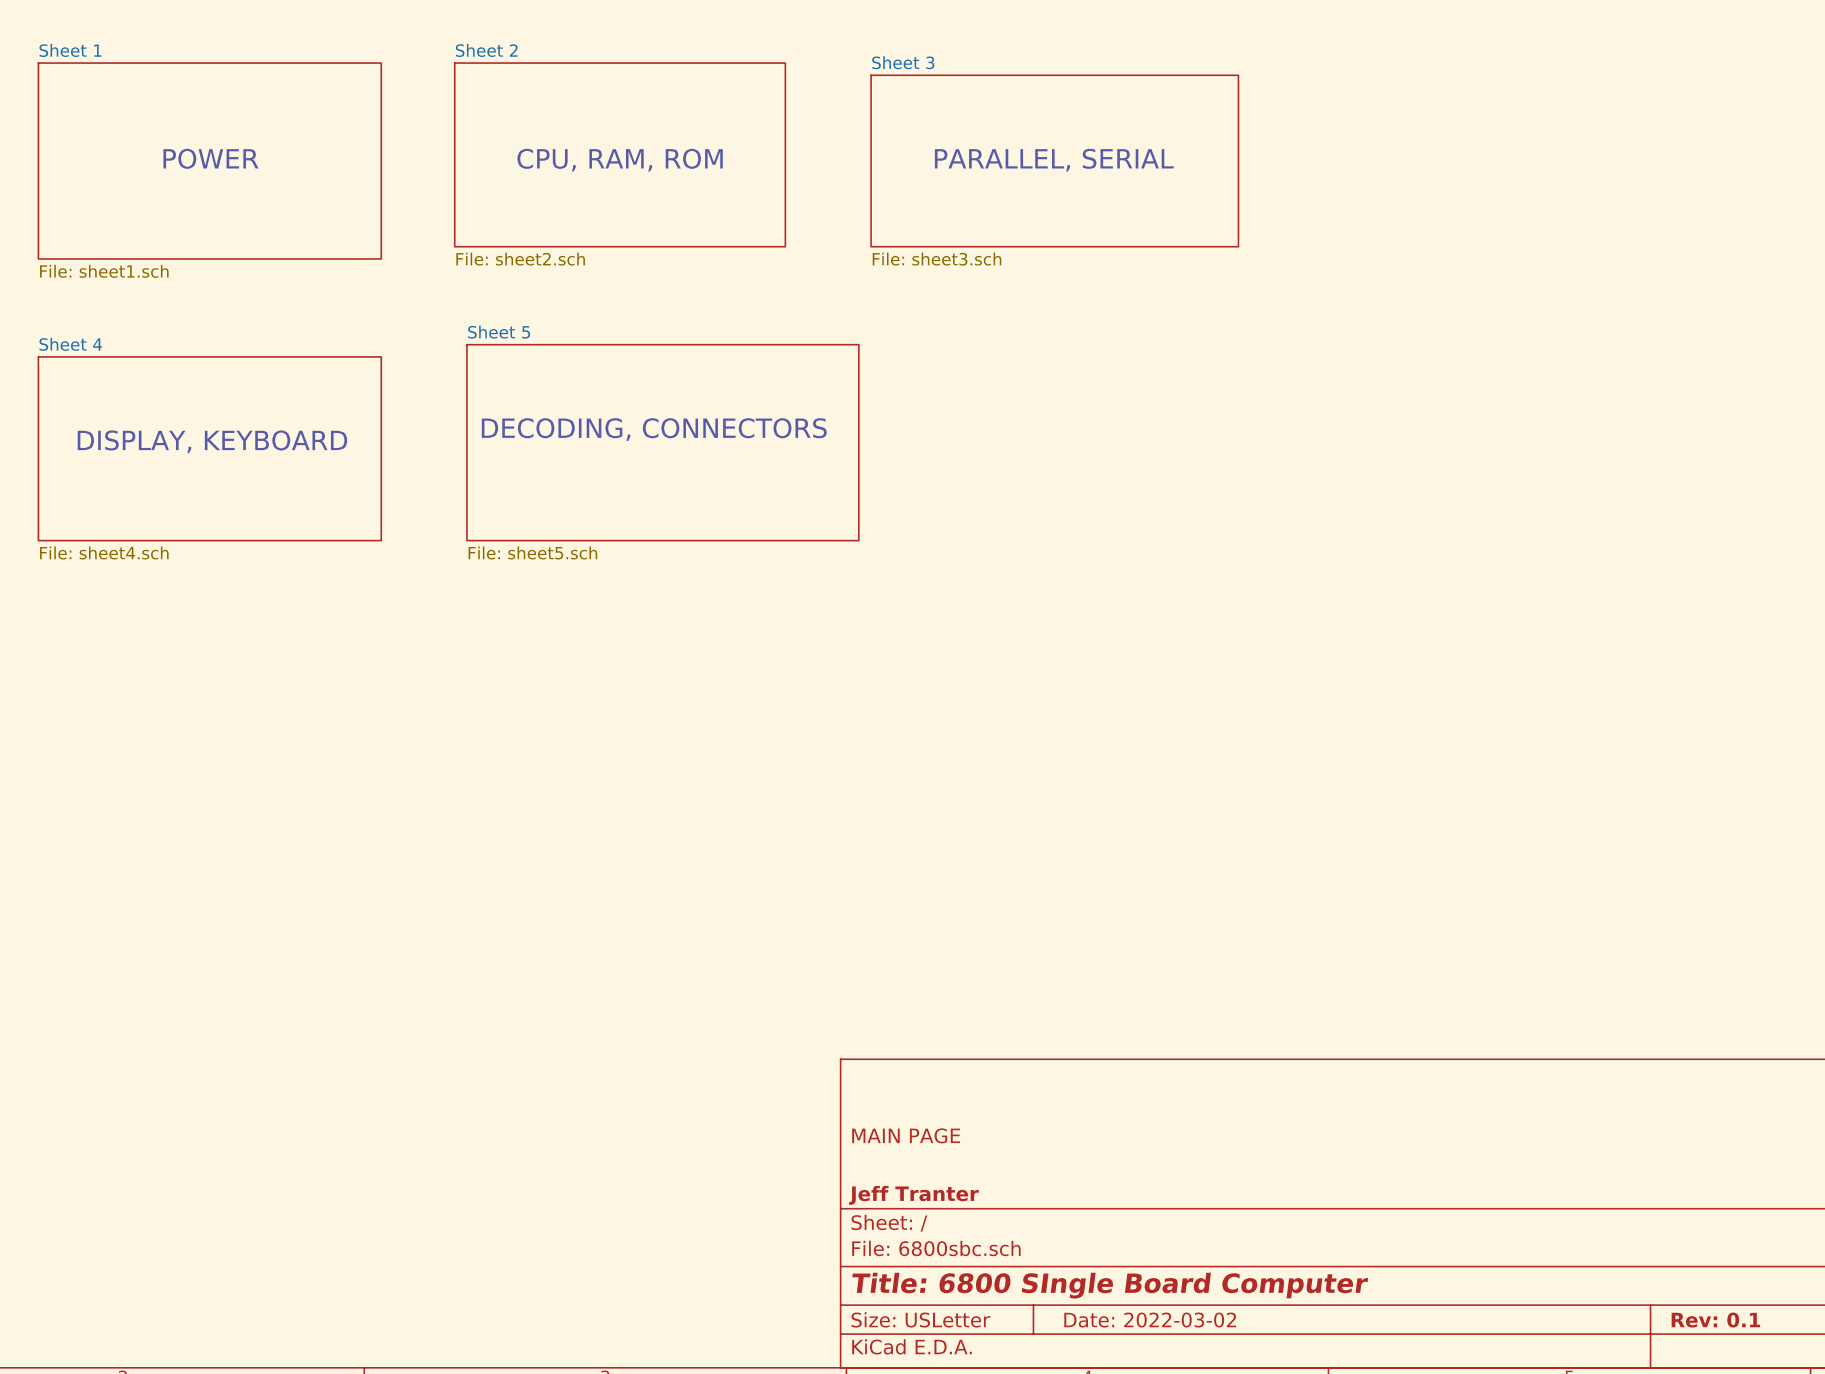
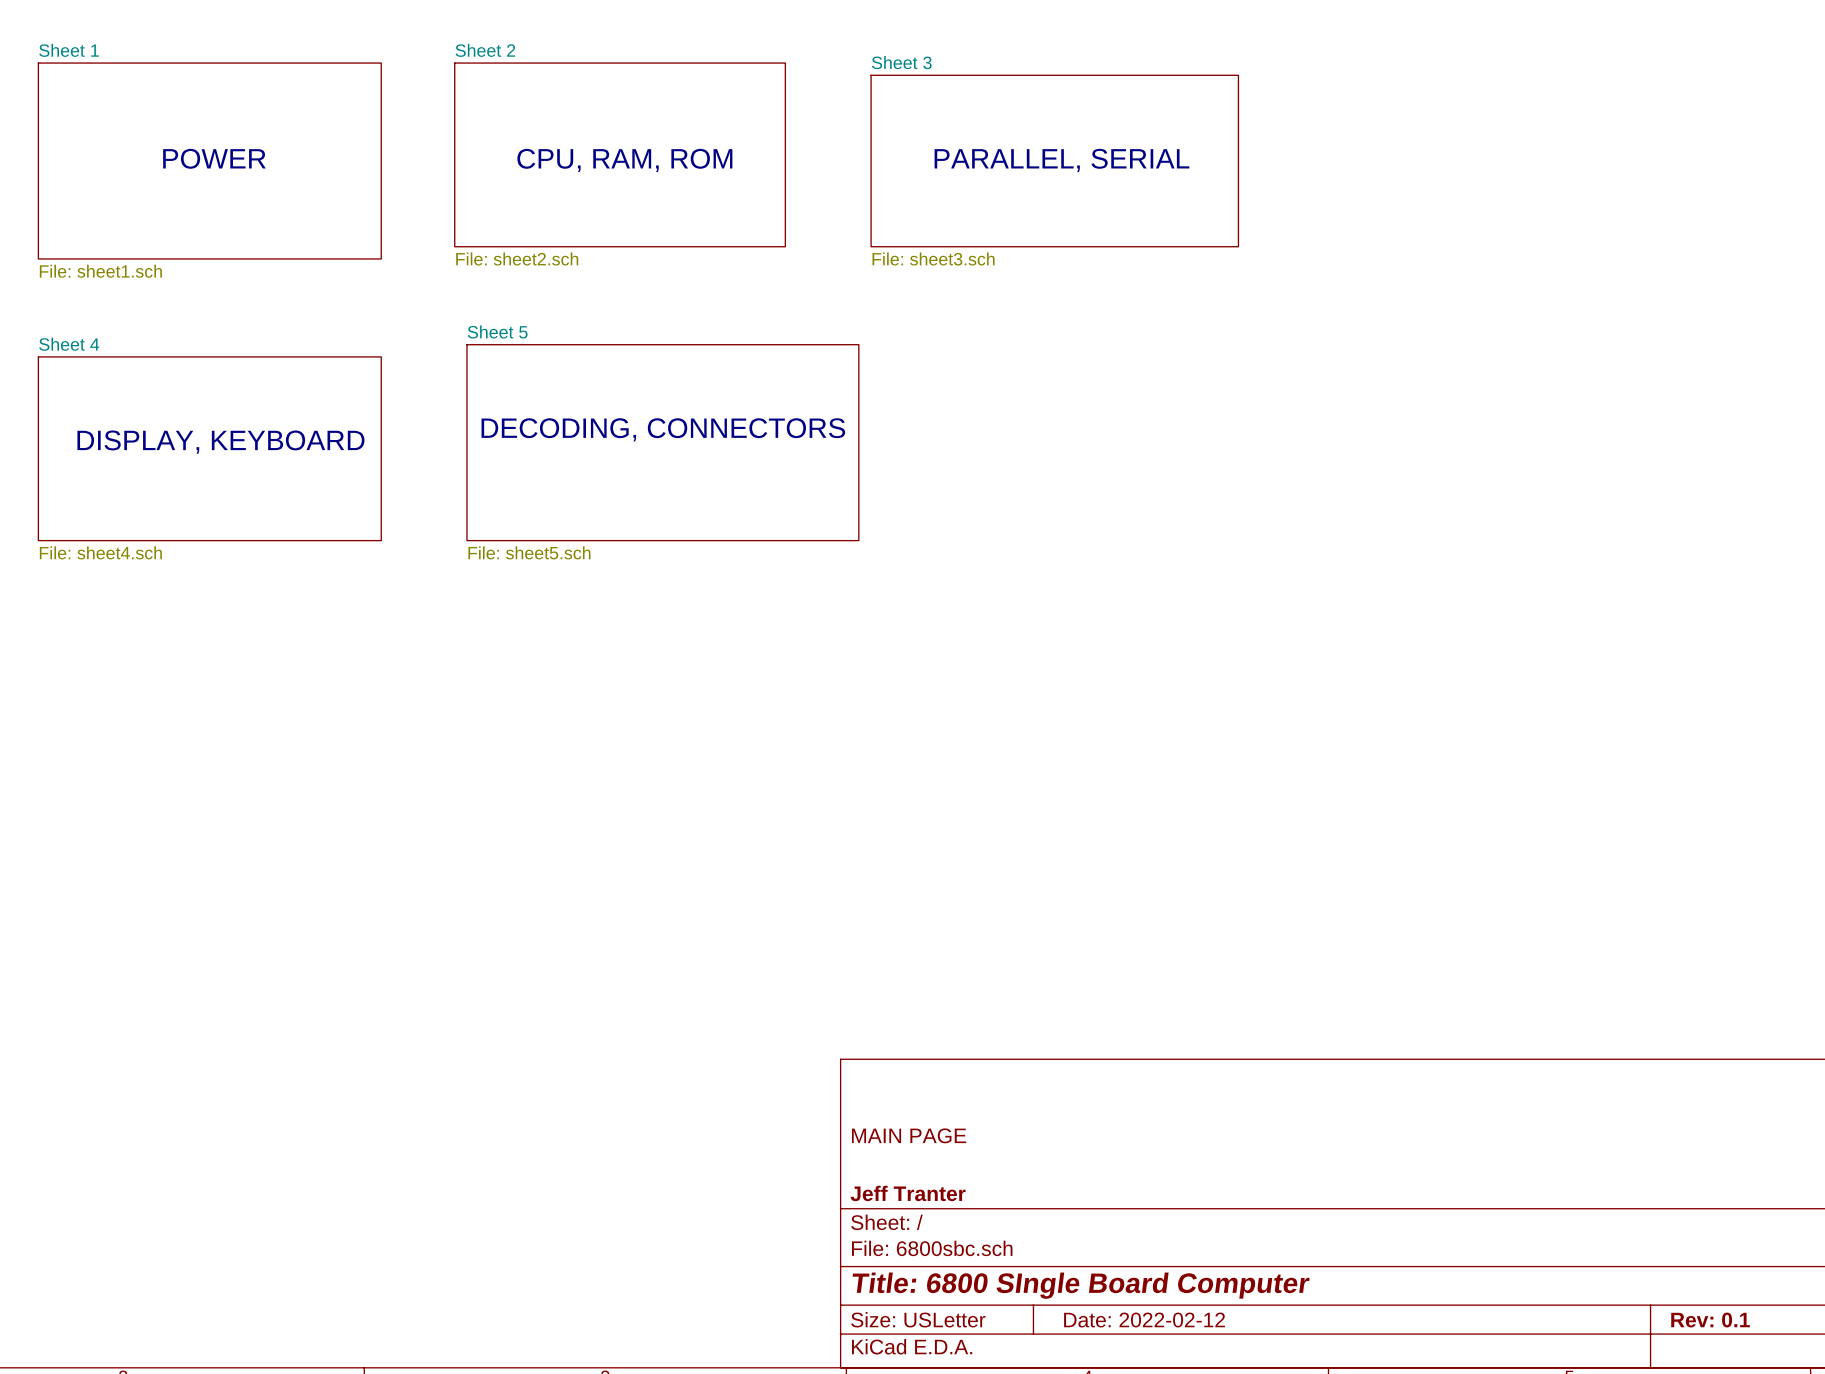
title block: Date: 2022-03-02 (1150, 1320) -> Date: 2022-02-12 (1144, 1320)

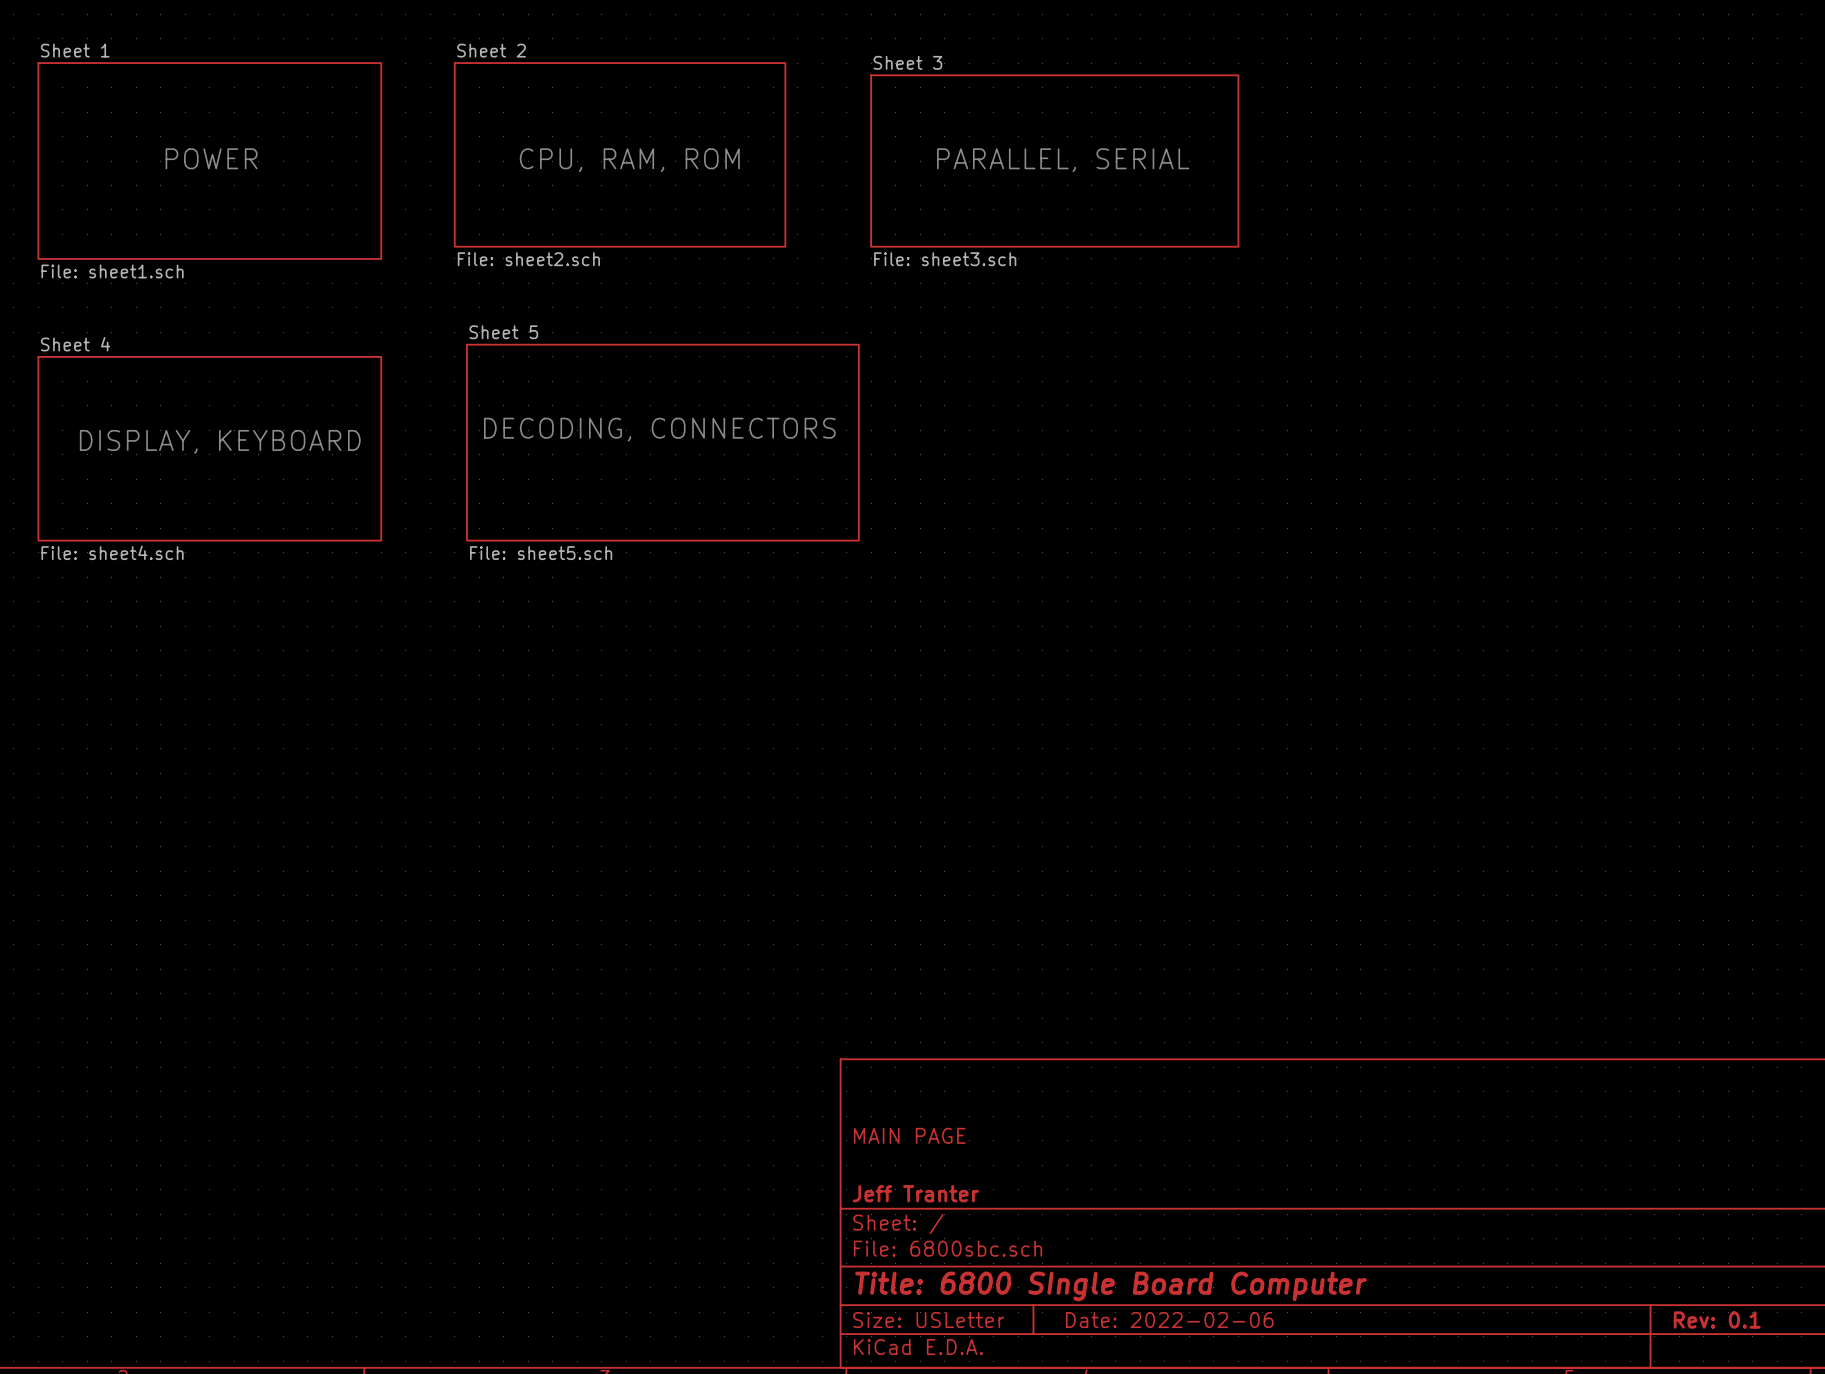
title block: Date: 2022-02-12 (1144, 1320) -> Date: 2022-02-06 (1169, 1320)

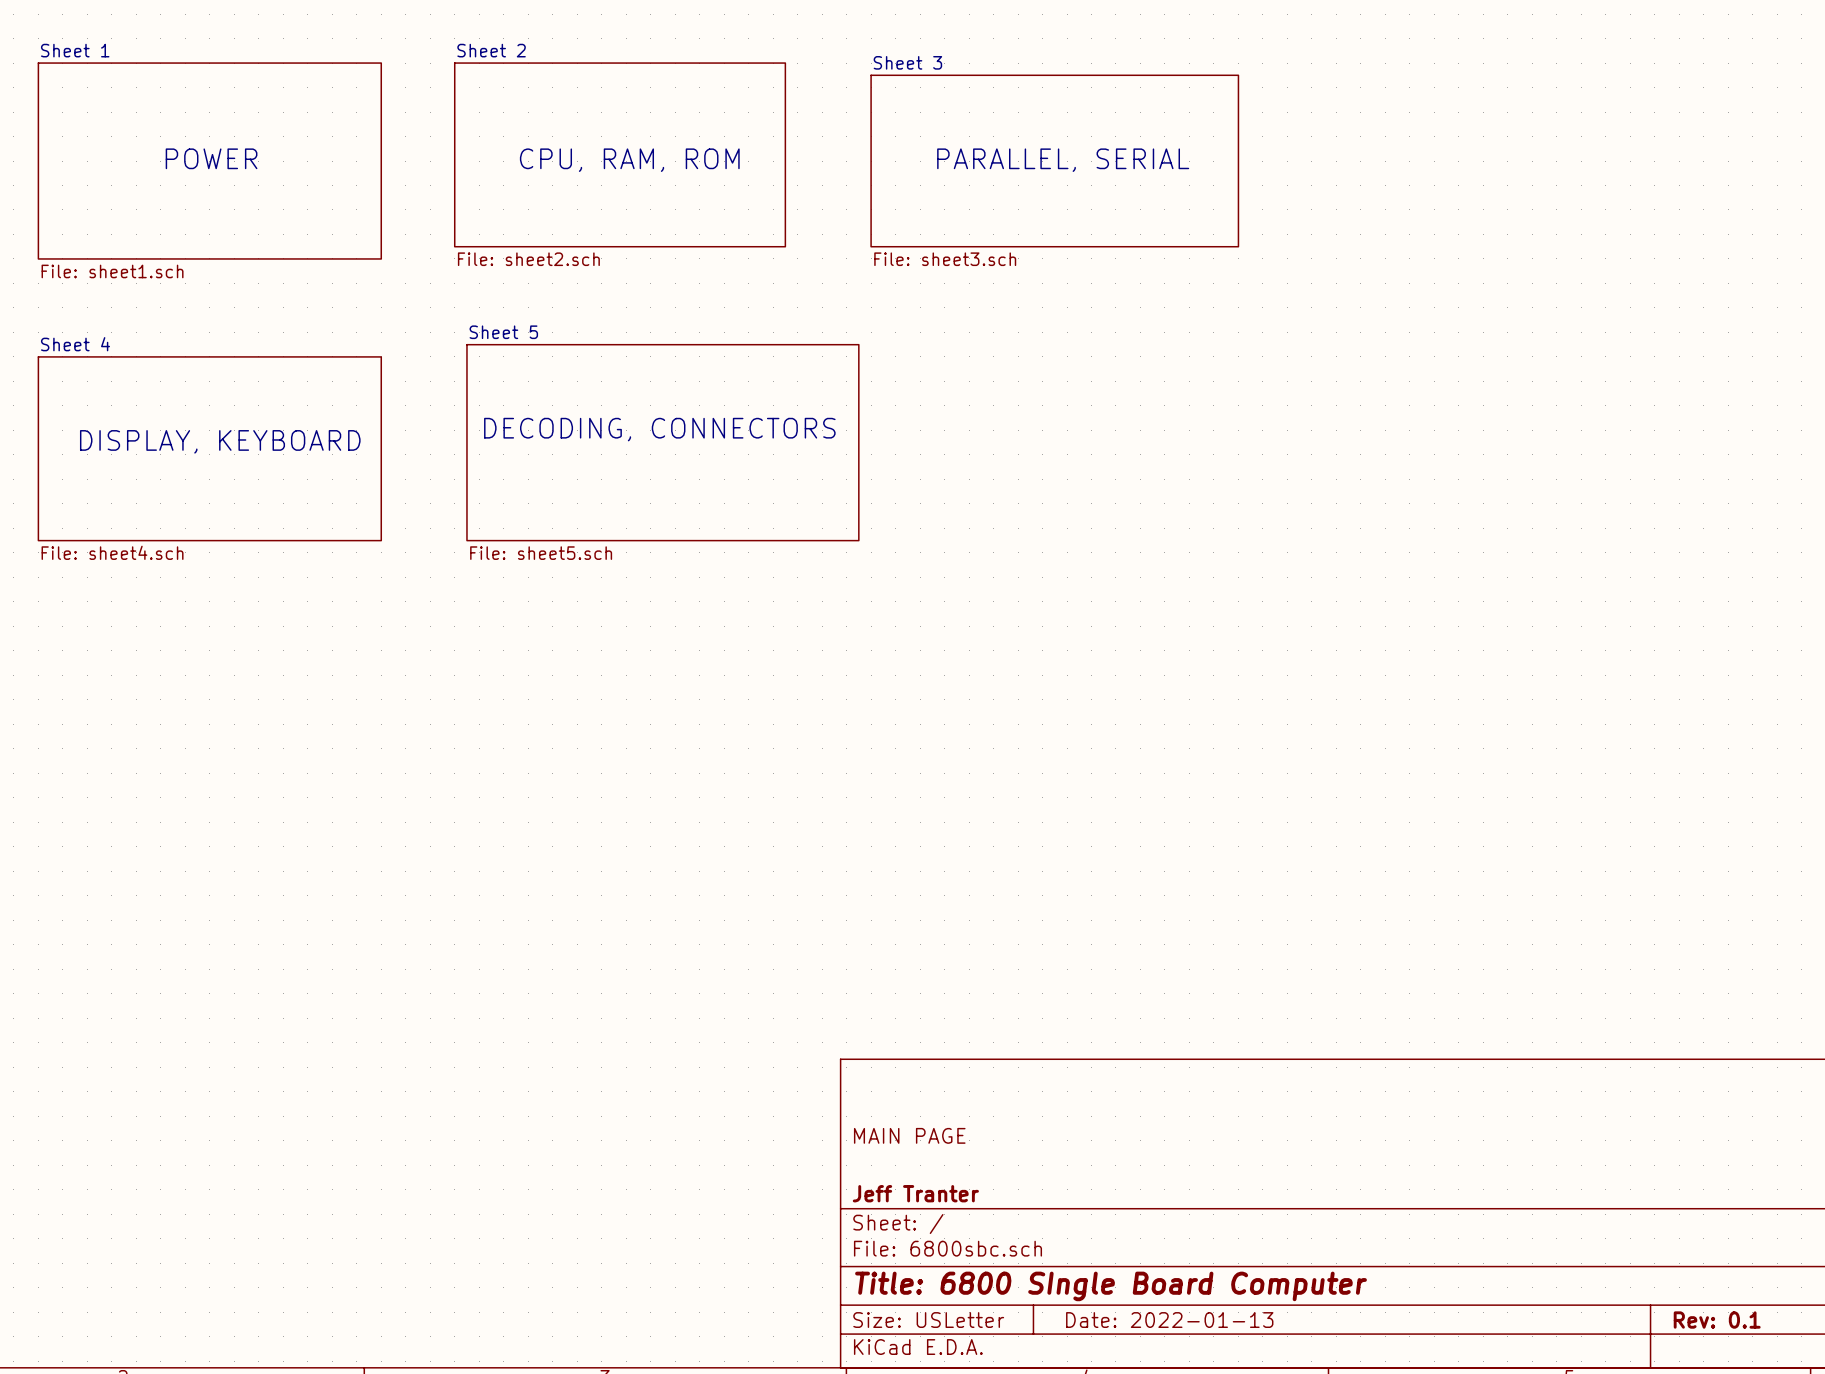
title block: Date: 2022-02-06 (1169, 1320) -> Date: 2022-01-13 (1169, 1320)

